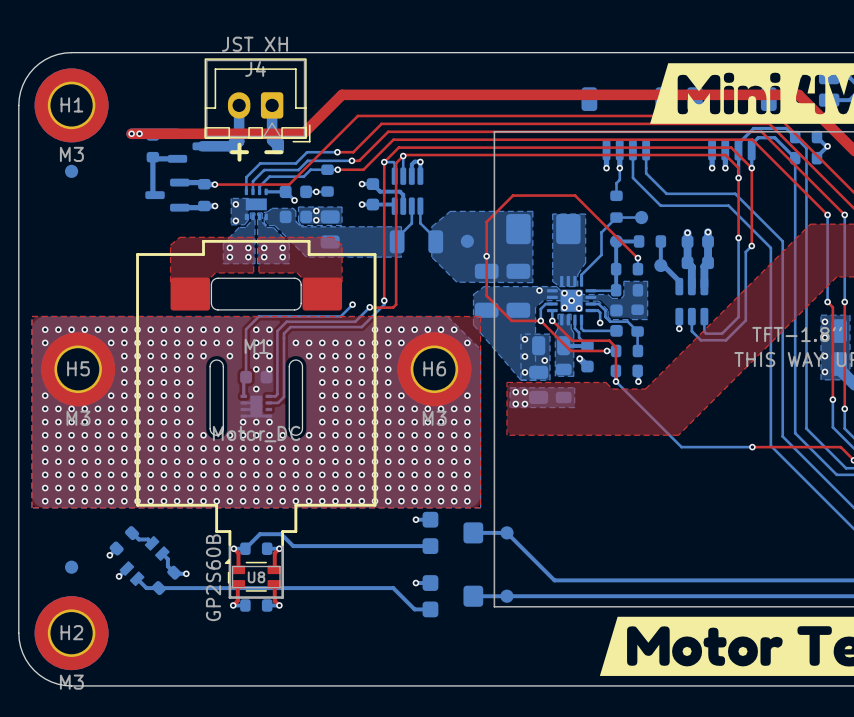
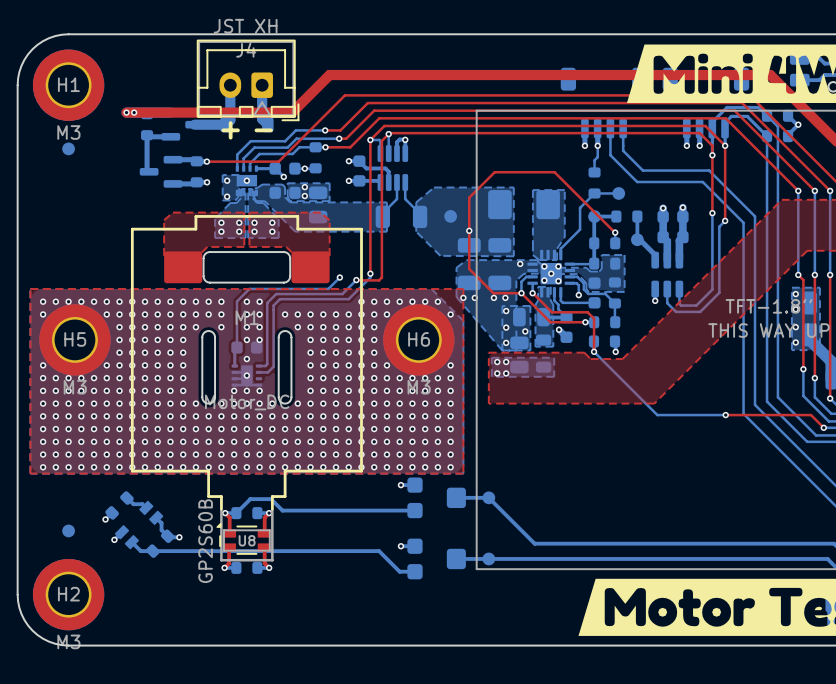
via: none -> (246, 180)
via: none -> (463, 297)
via: none -> (474, 297)
via: none -> (493, 297)
via: none -> (505, 297)
via: none -> (246, 375)

